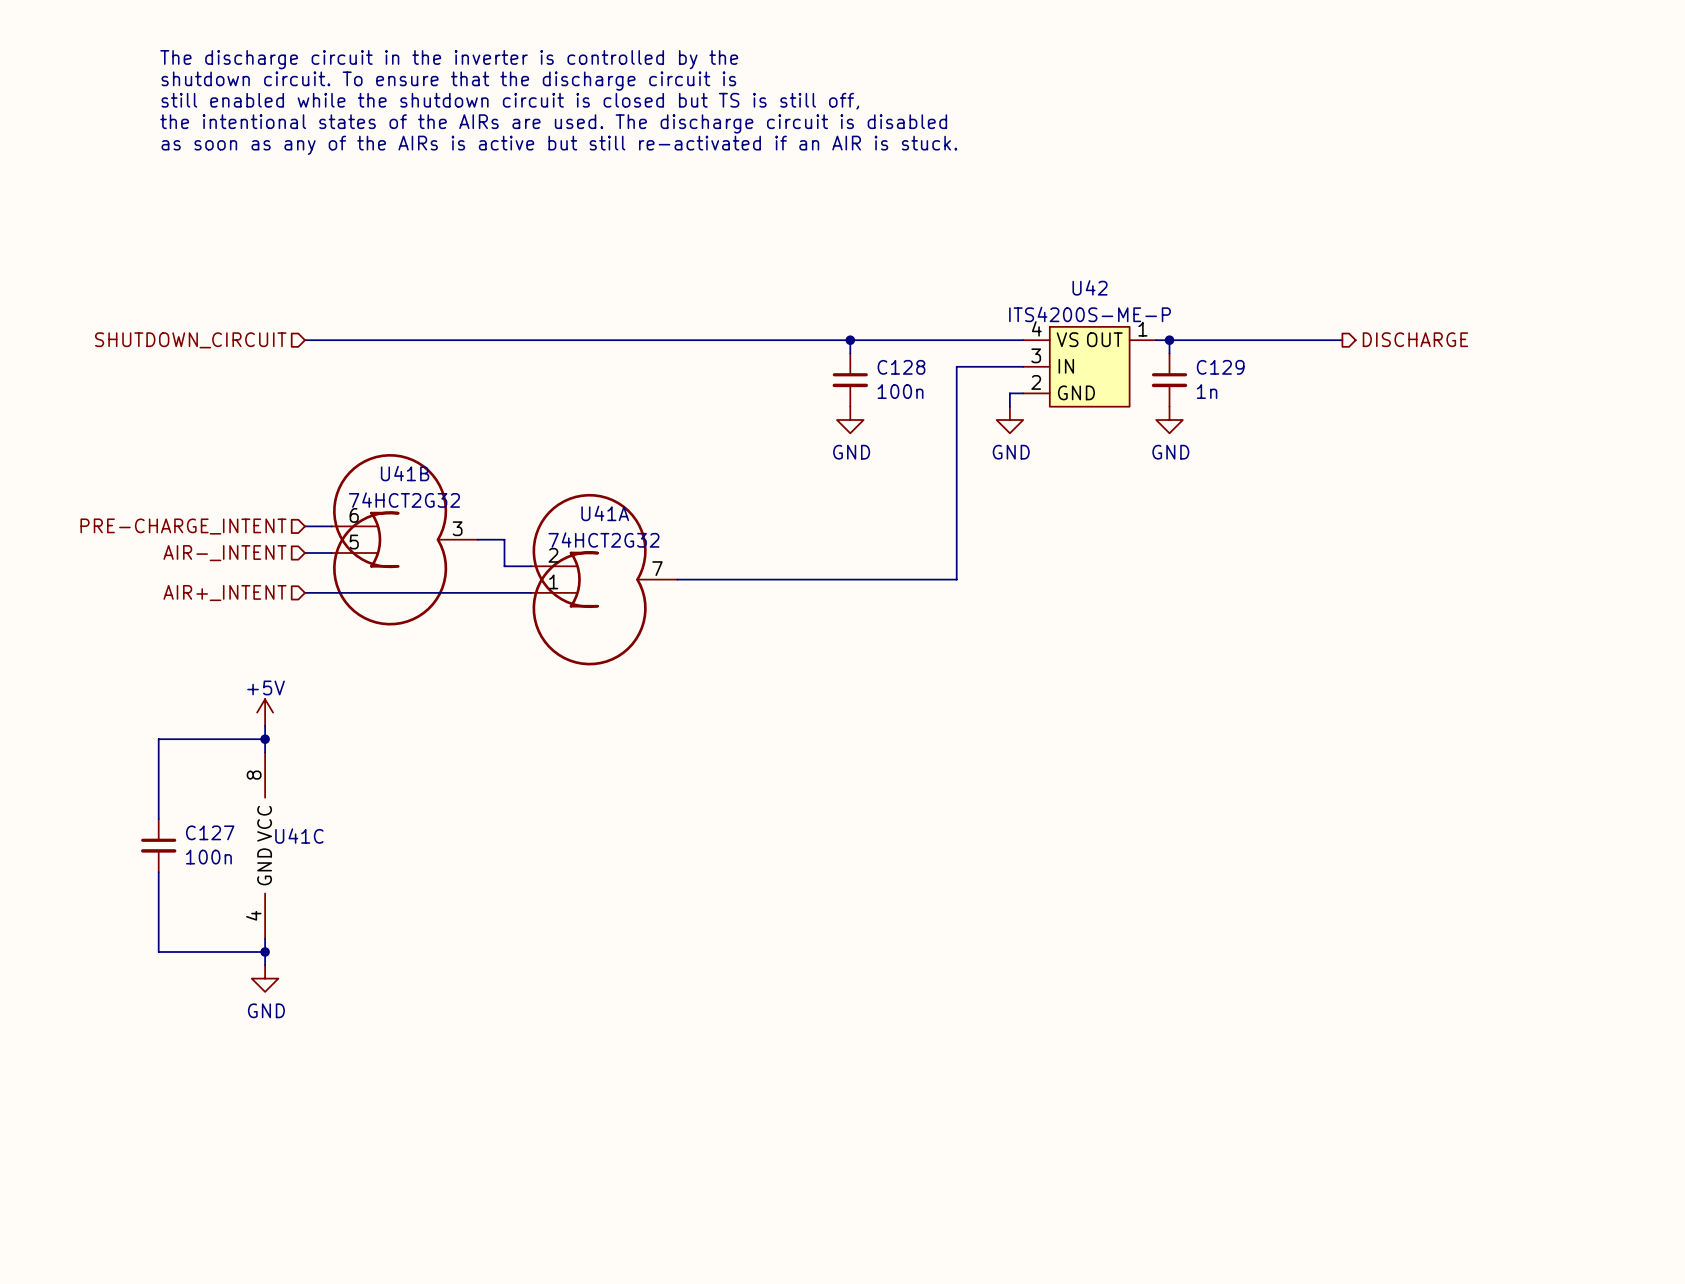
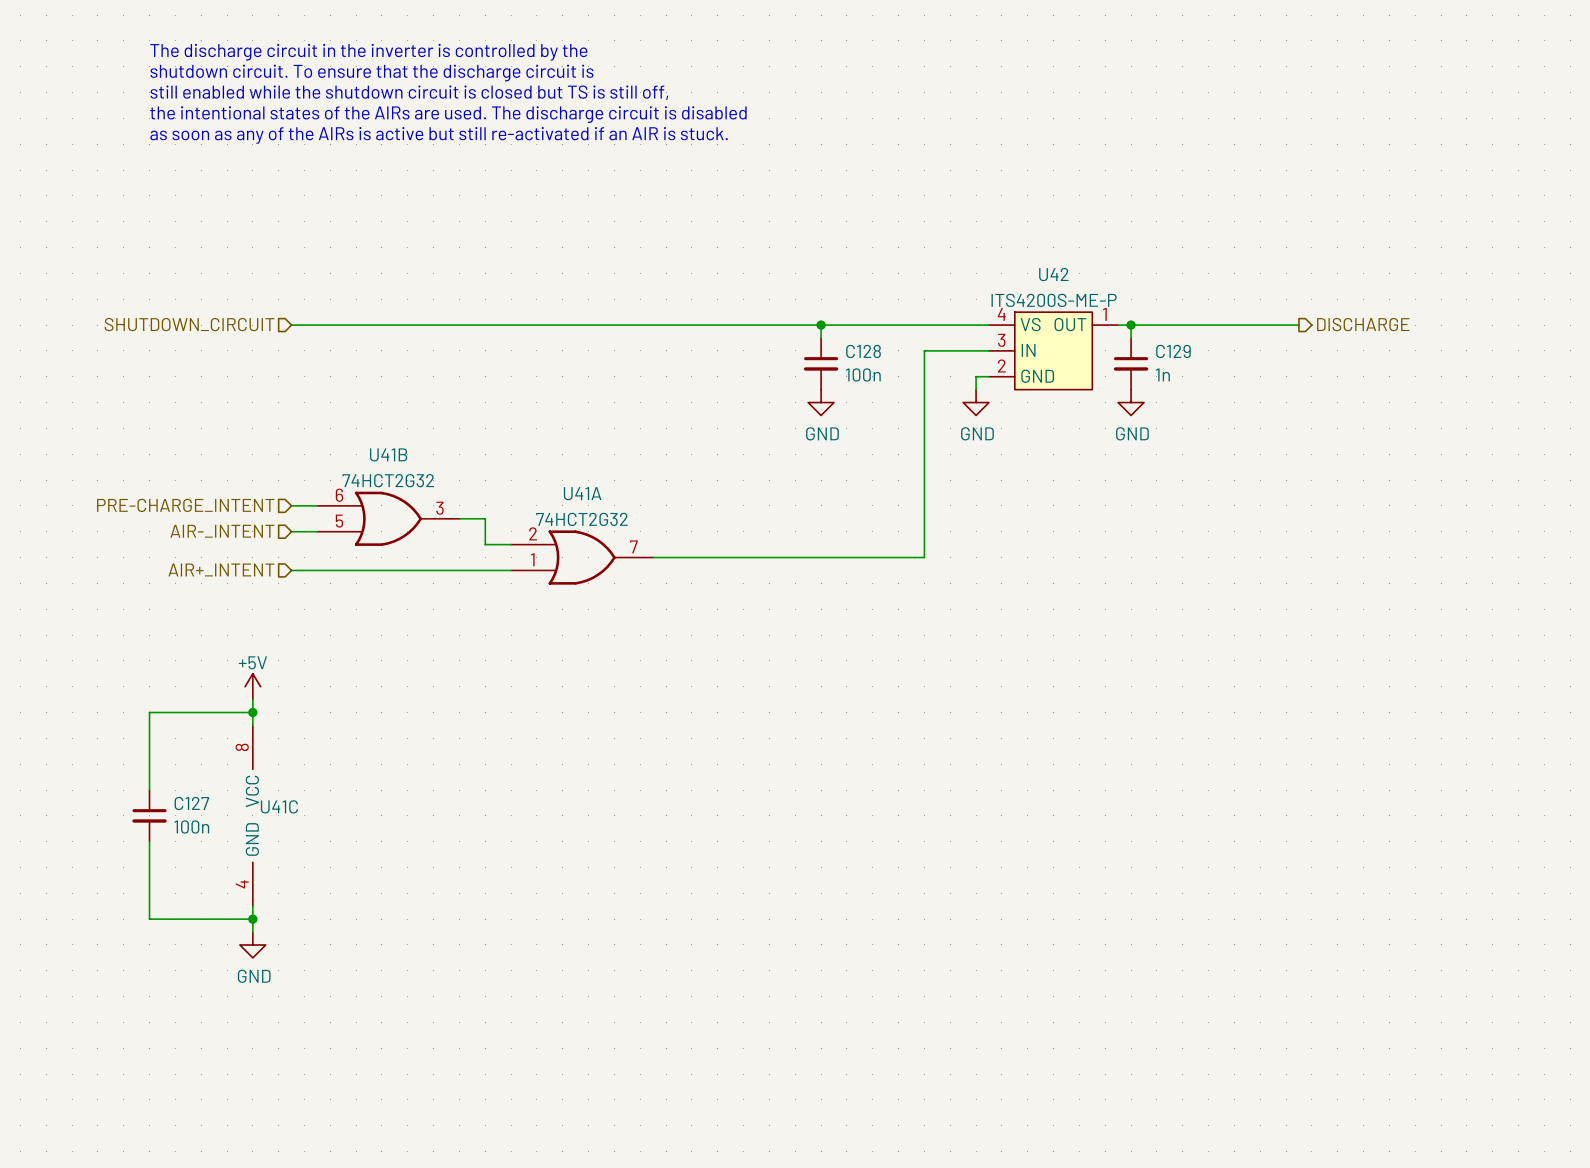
U41B symbol: [331, 454, 478, 626] -> [317, 491, 460, 546]
U41A symbol: [531, 493, 678, 666] -> [511, 530, 654, 585]

